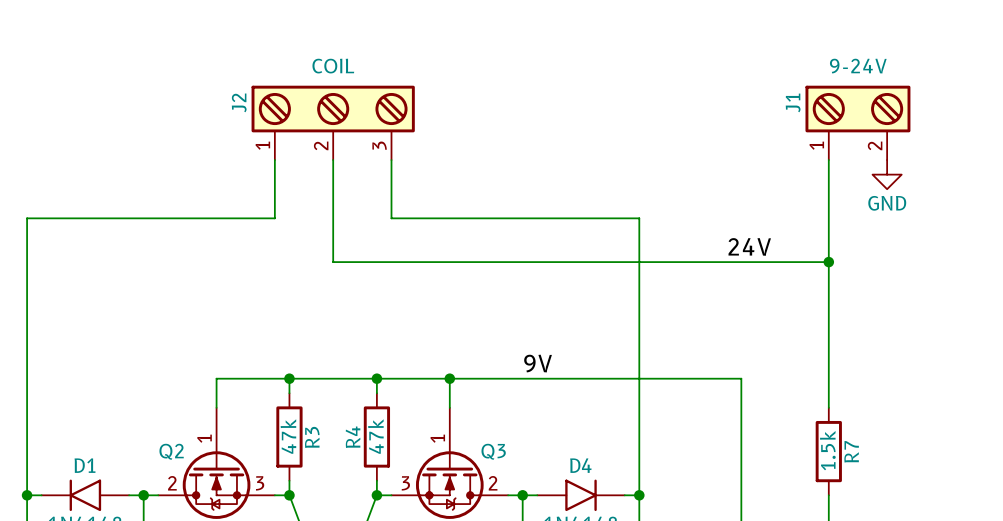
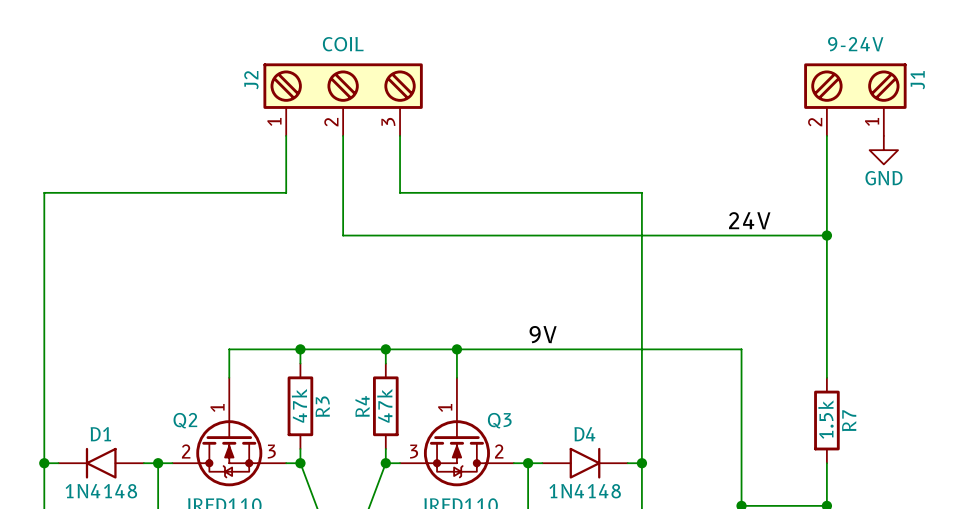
J1 flip: as is (857, 109) -> left-right (855, 86)

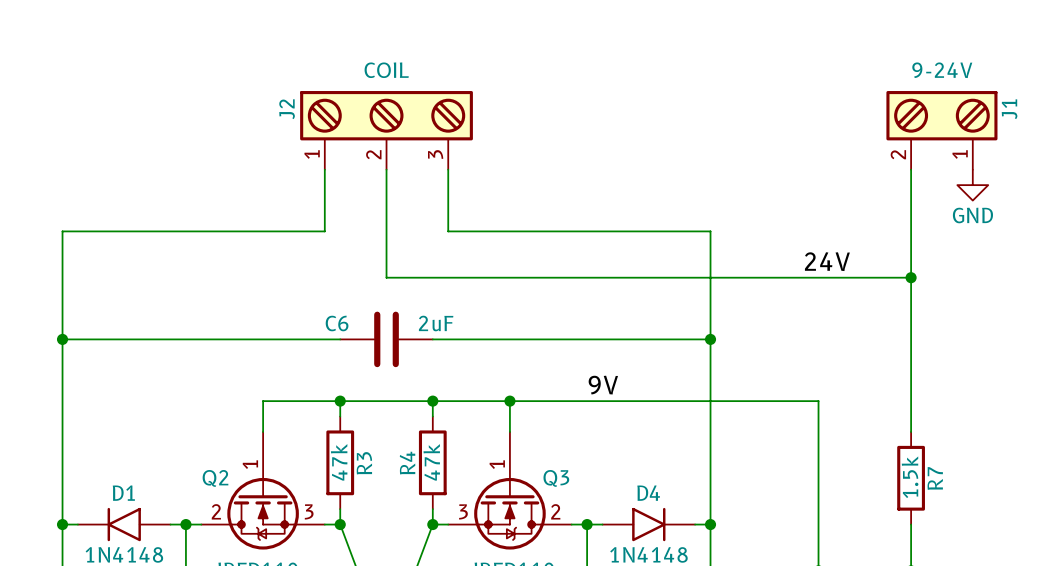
wire: none -> (62, 339) (340, 339)
junction: none -> (62, 339)
C6: none -> 2uF (386, 339)
wire: none -> (432, 339) (710, 339)
junction: none -> (710, 339)

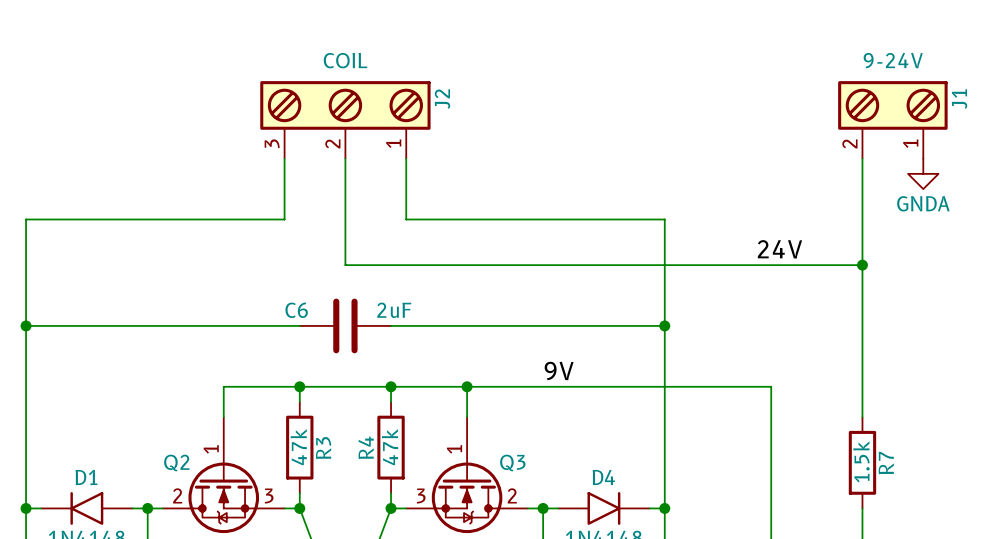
J2 flip: as is (386, 115) -> left-right (345, 105)
power symbol: GND (972, 185) -> GNDA (923, 173)

